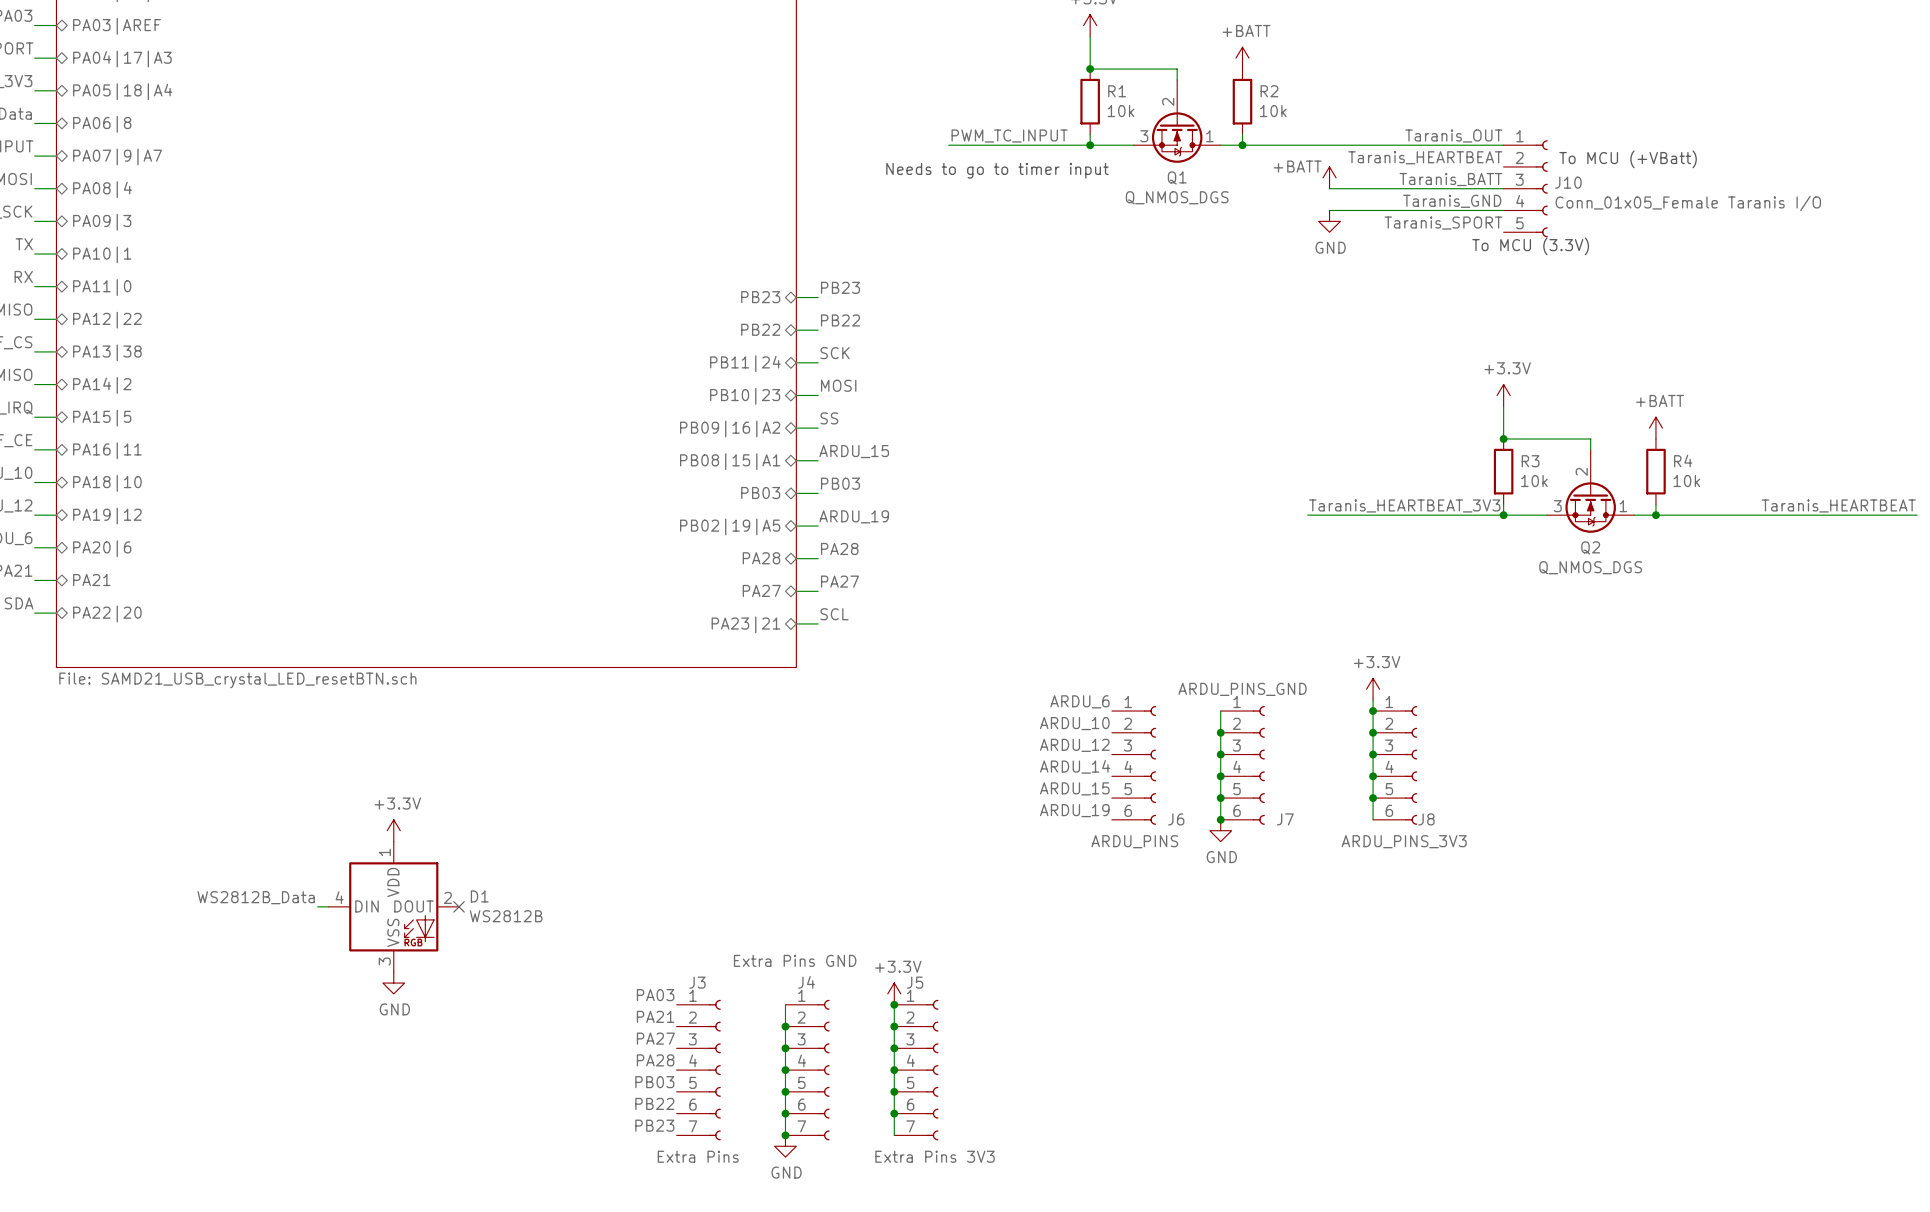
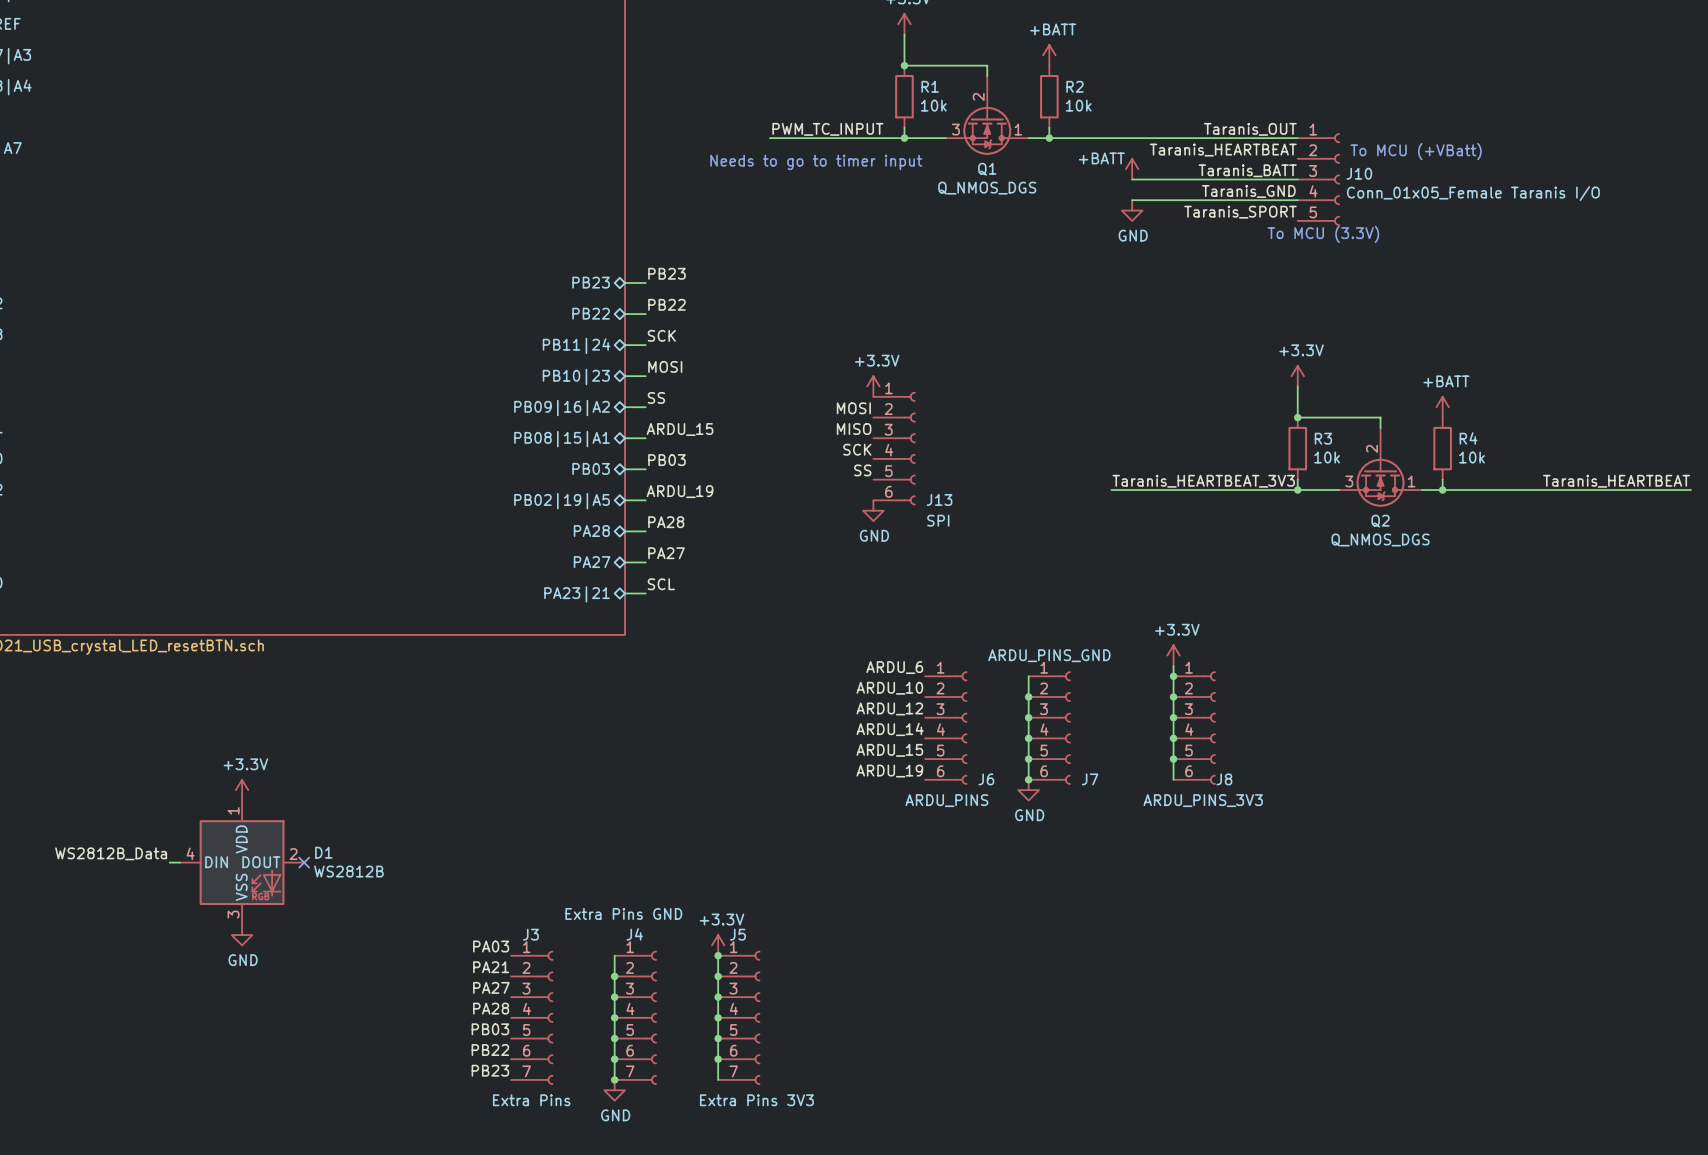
power symbol: none -> +3.3V (873, 386)
label: none -> MOSI (853, 408)
label: none -> MISO (854, 429)
J13: none -> SPI (894, 448)
label: none -> SCK (857, 449)
label: none -> SS (862, 470)
power symbol: none -> GND (873, 510)

